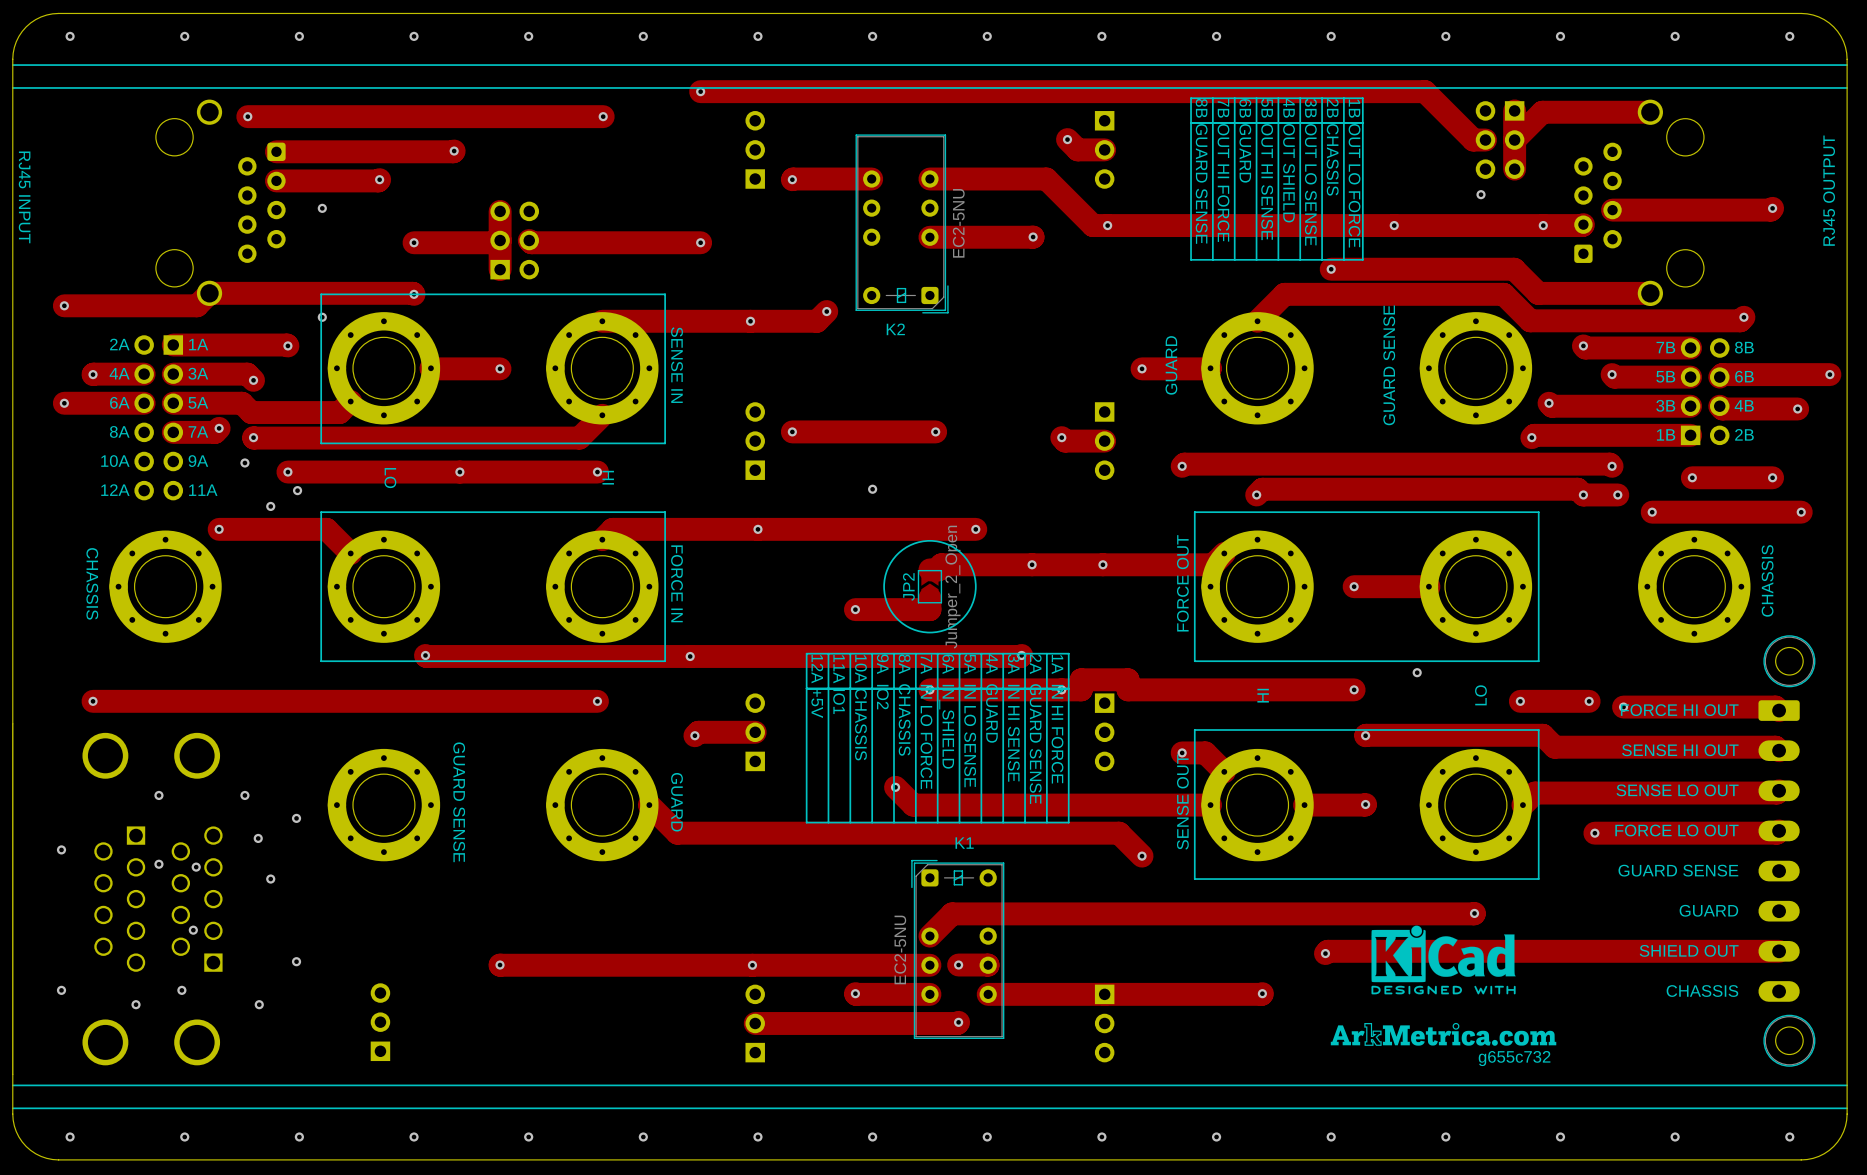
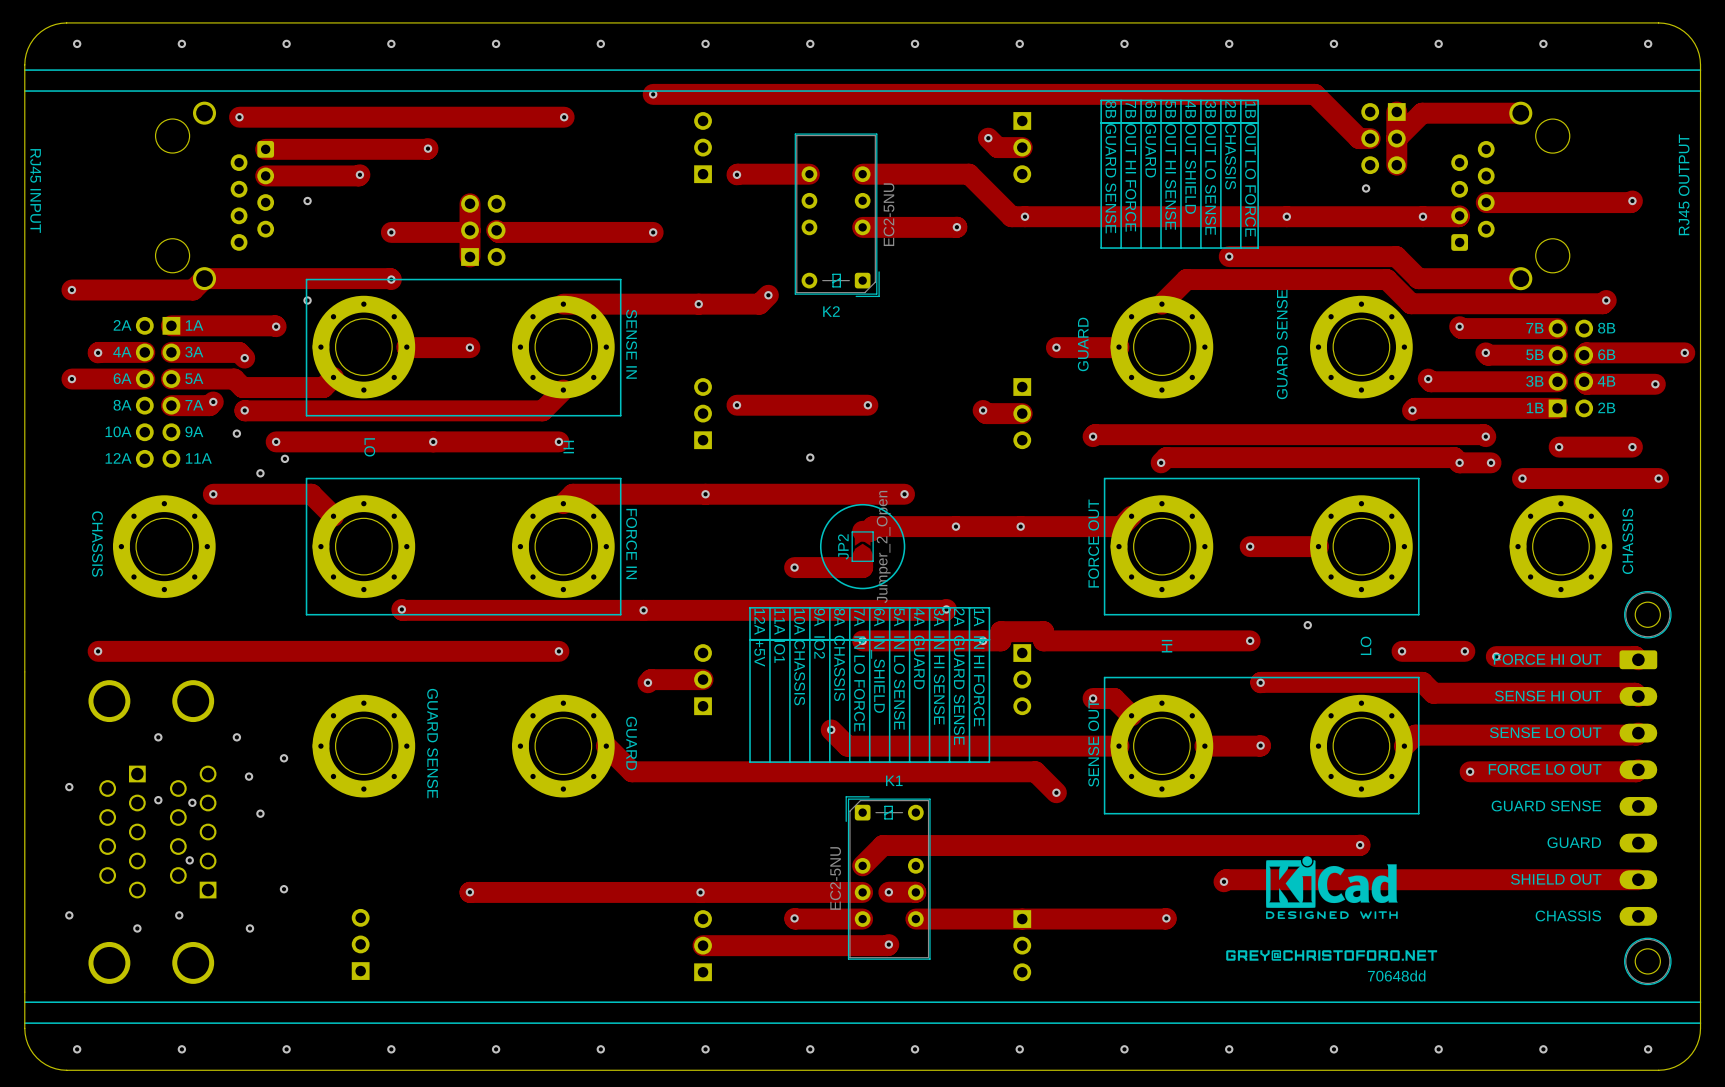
drawing shape: [1330, 1022, 1557, 1046] -> [1226, 950, 1438, 961]
text: g655c732 (1514, 1058) -> 70648dd (1396, 975)

